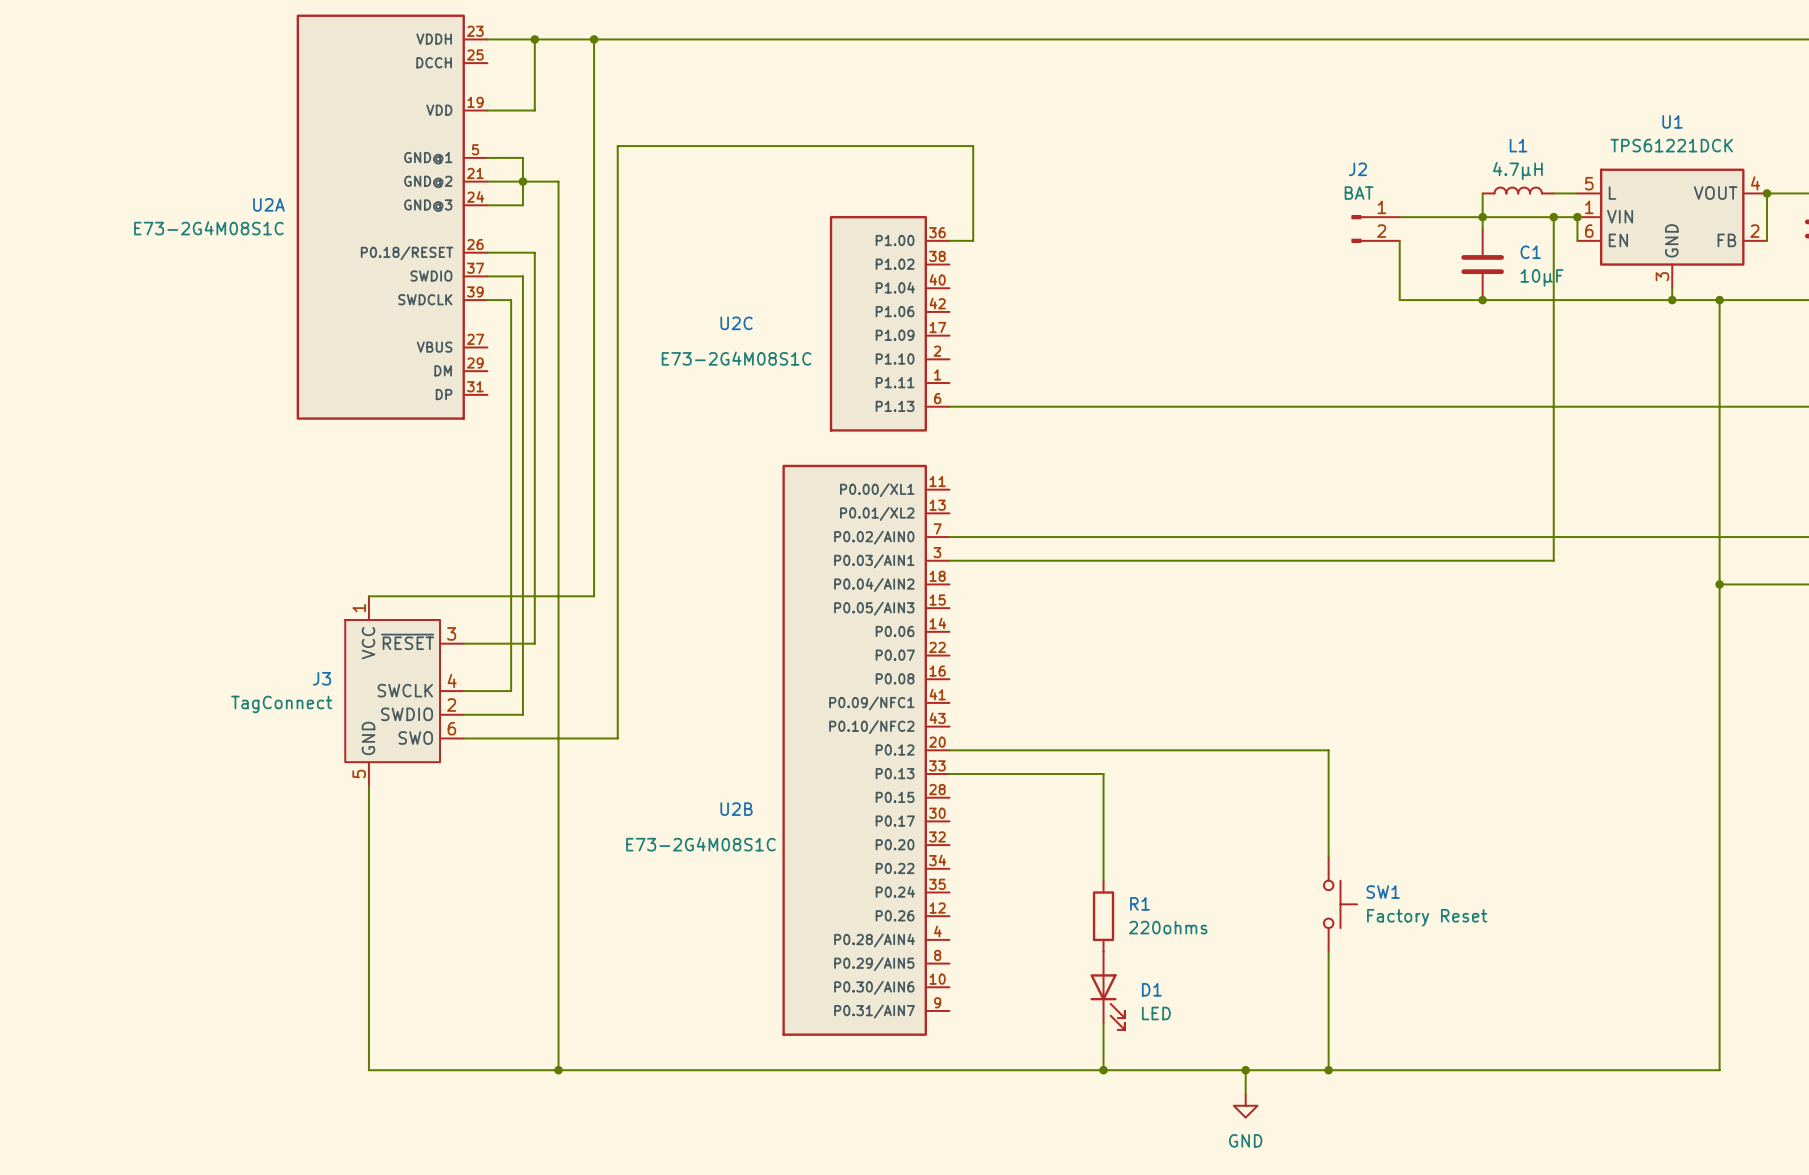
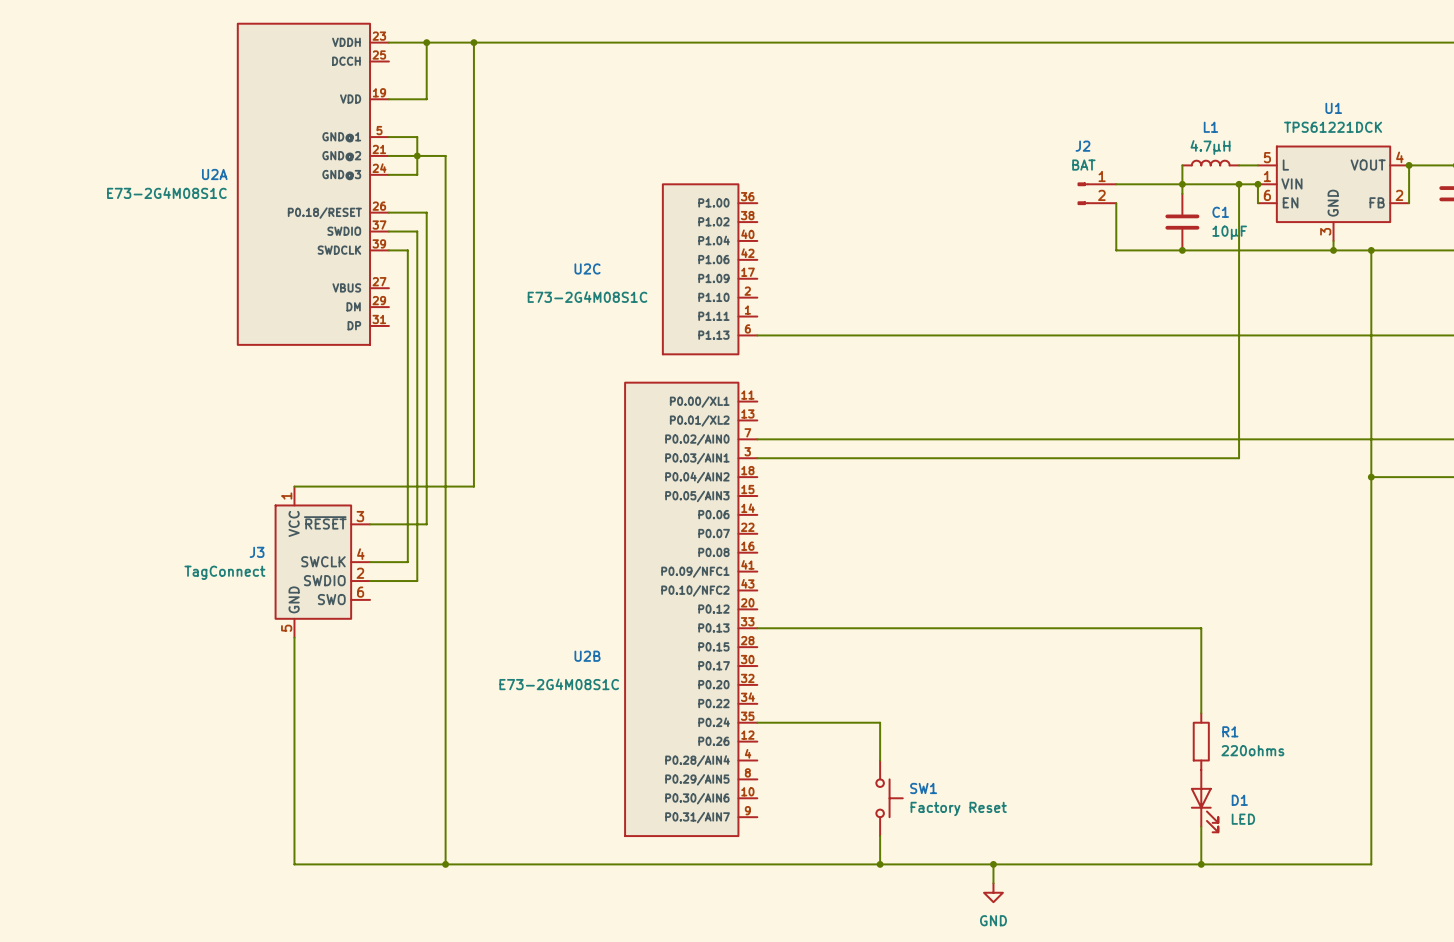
wire: (949, 240) (973, 240) (973, 146) (617, 146) (617, 738) (463, 738) -> none
wire: (949, 750) (1328, 750) (1328, 856) -> none
wire: (1103, 774) (1103, 880) -> (880, 628) (1201, 628) (1201, 713)
wire: none -> (757, 722) (880, 722) (880, 760)
SW1 position: (1340, 904) -> (889, 798)
R1 position: (1103, 916) -> (1201, 741)
wire: (1328, 951) (1328, 1070) -> none
D1 position: (1107, 990) -> (1204, 801)
wire: none -> (1201, 826) (1201, 864)
junction: (1328, 1070) -> none
junction: none -> (1201, 864)

